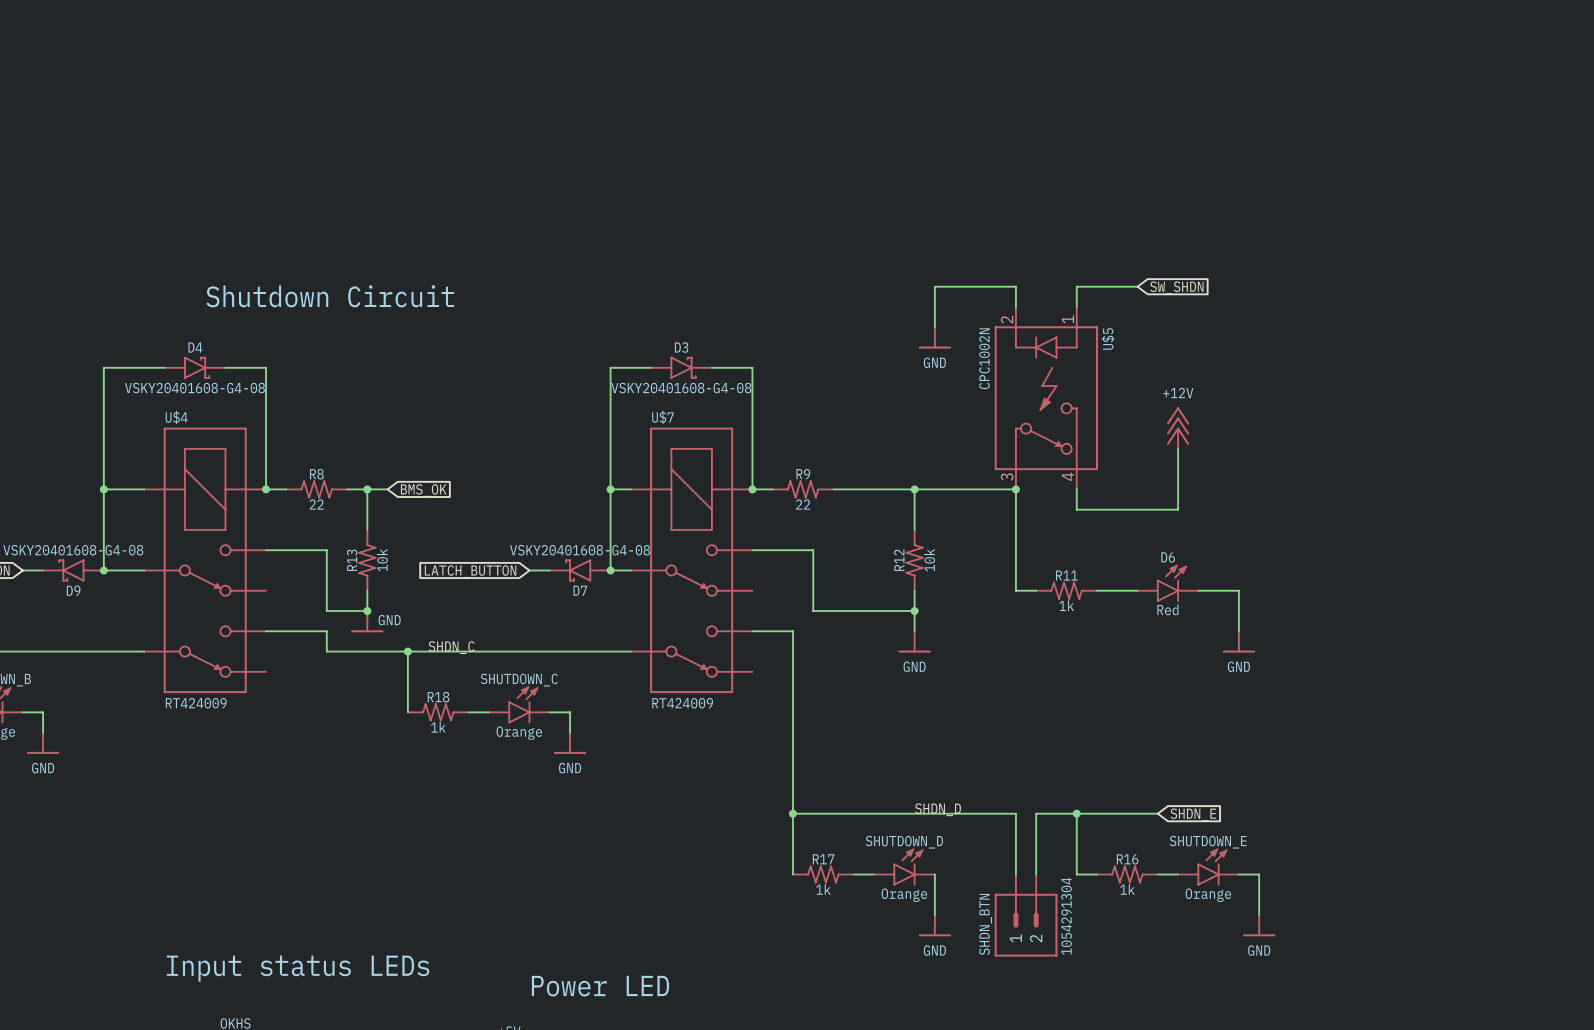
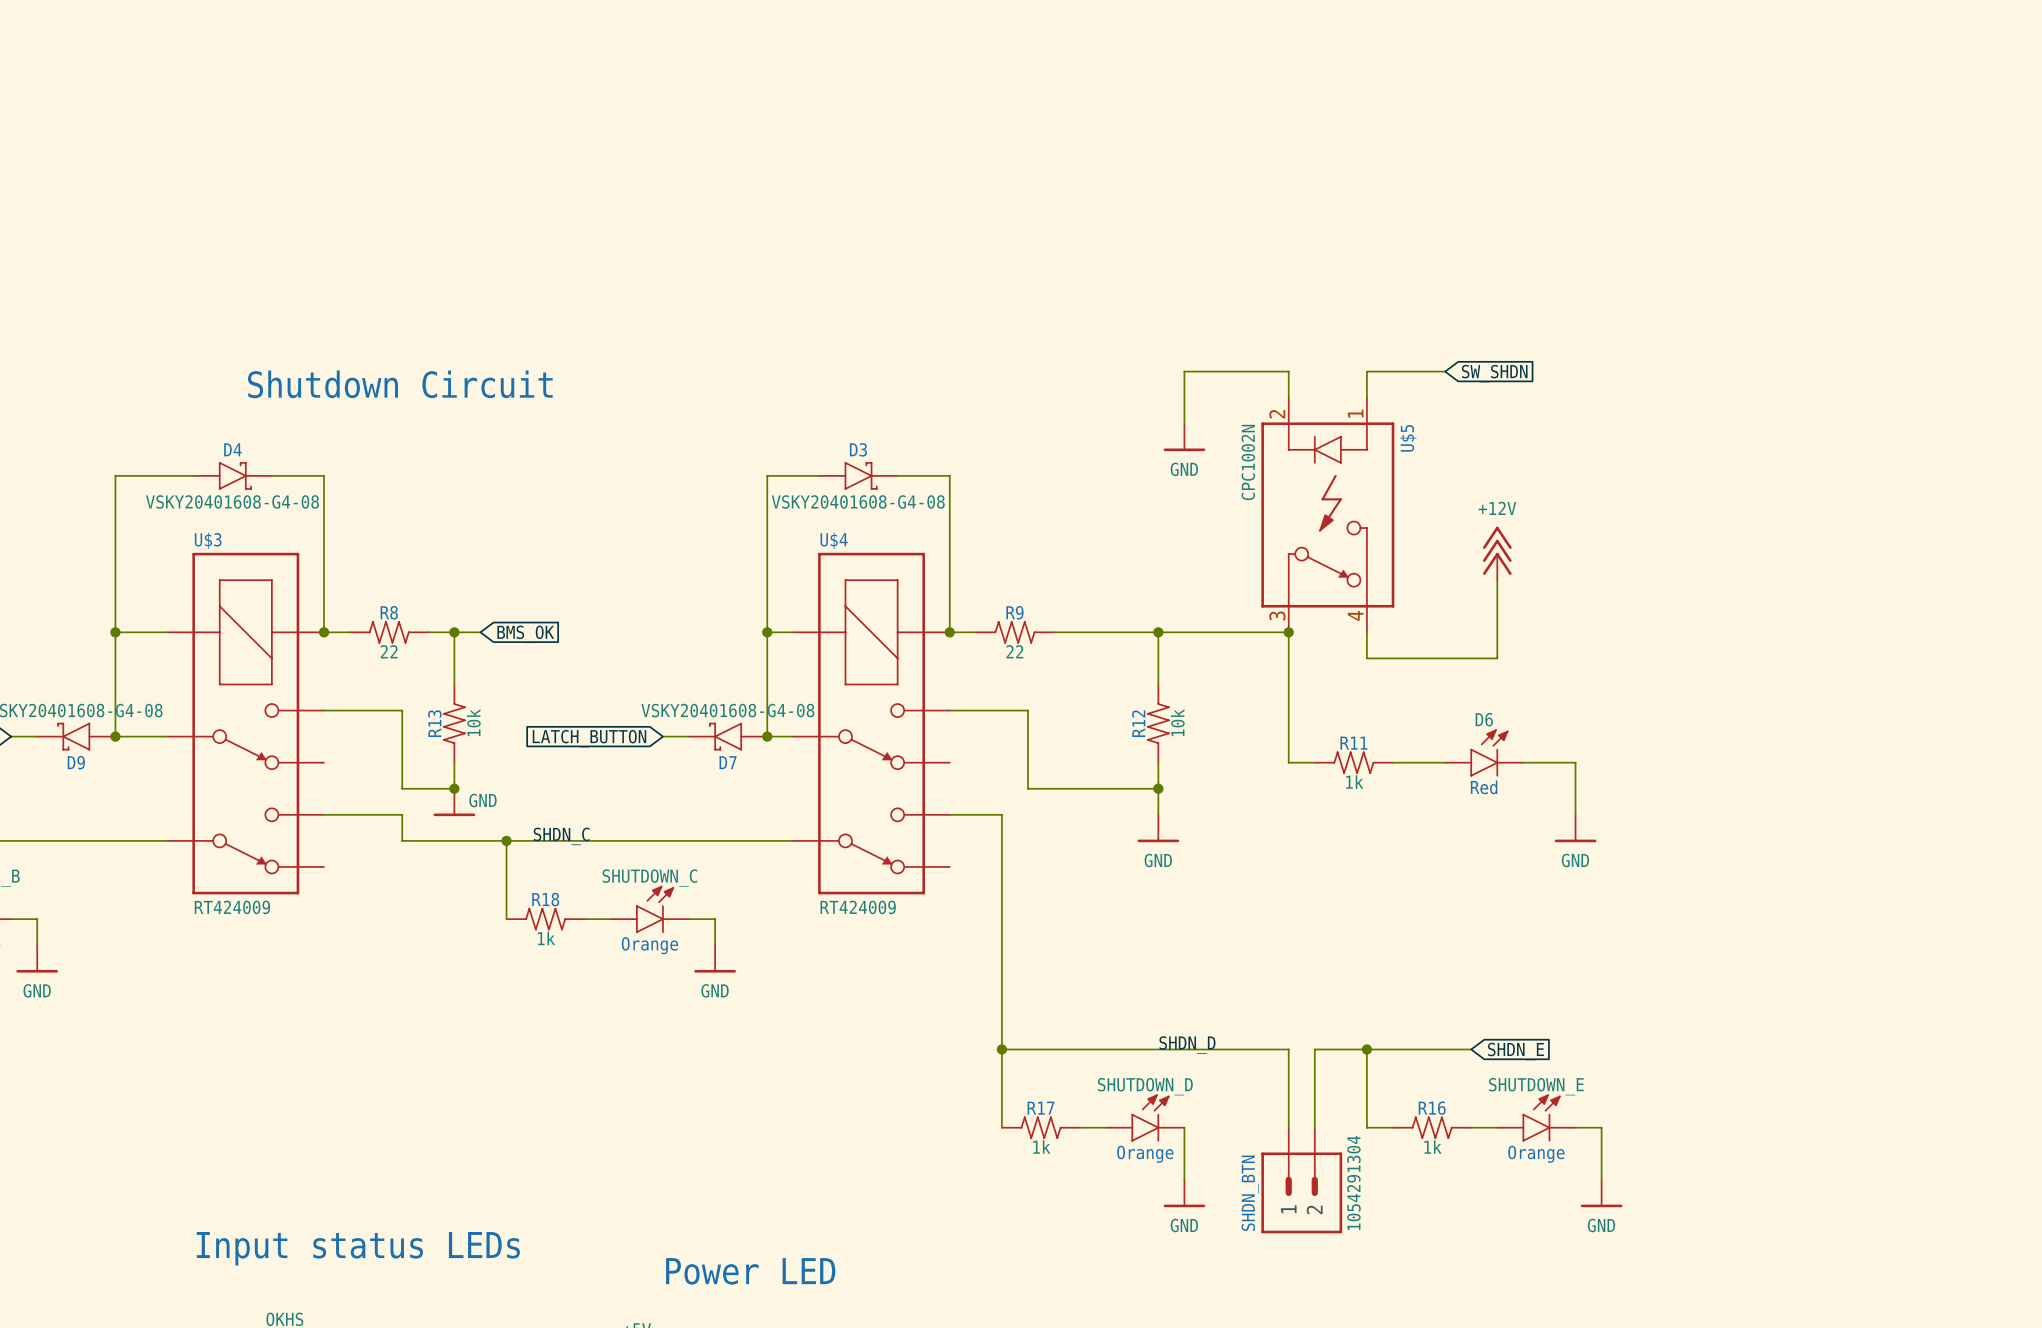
U$4 name: U$4 (176, 417) -> U$3 (208, 540)
U$7 name: U$7 (662, 417) -> U$4 (834, 540)

